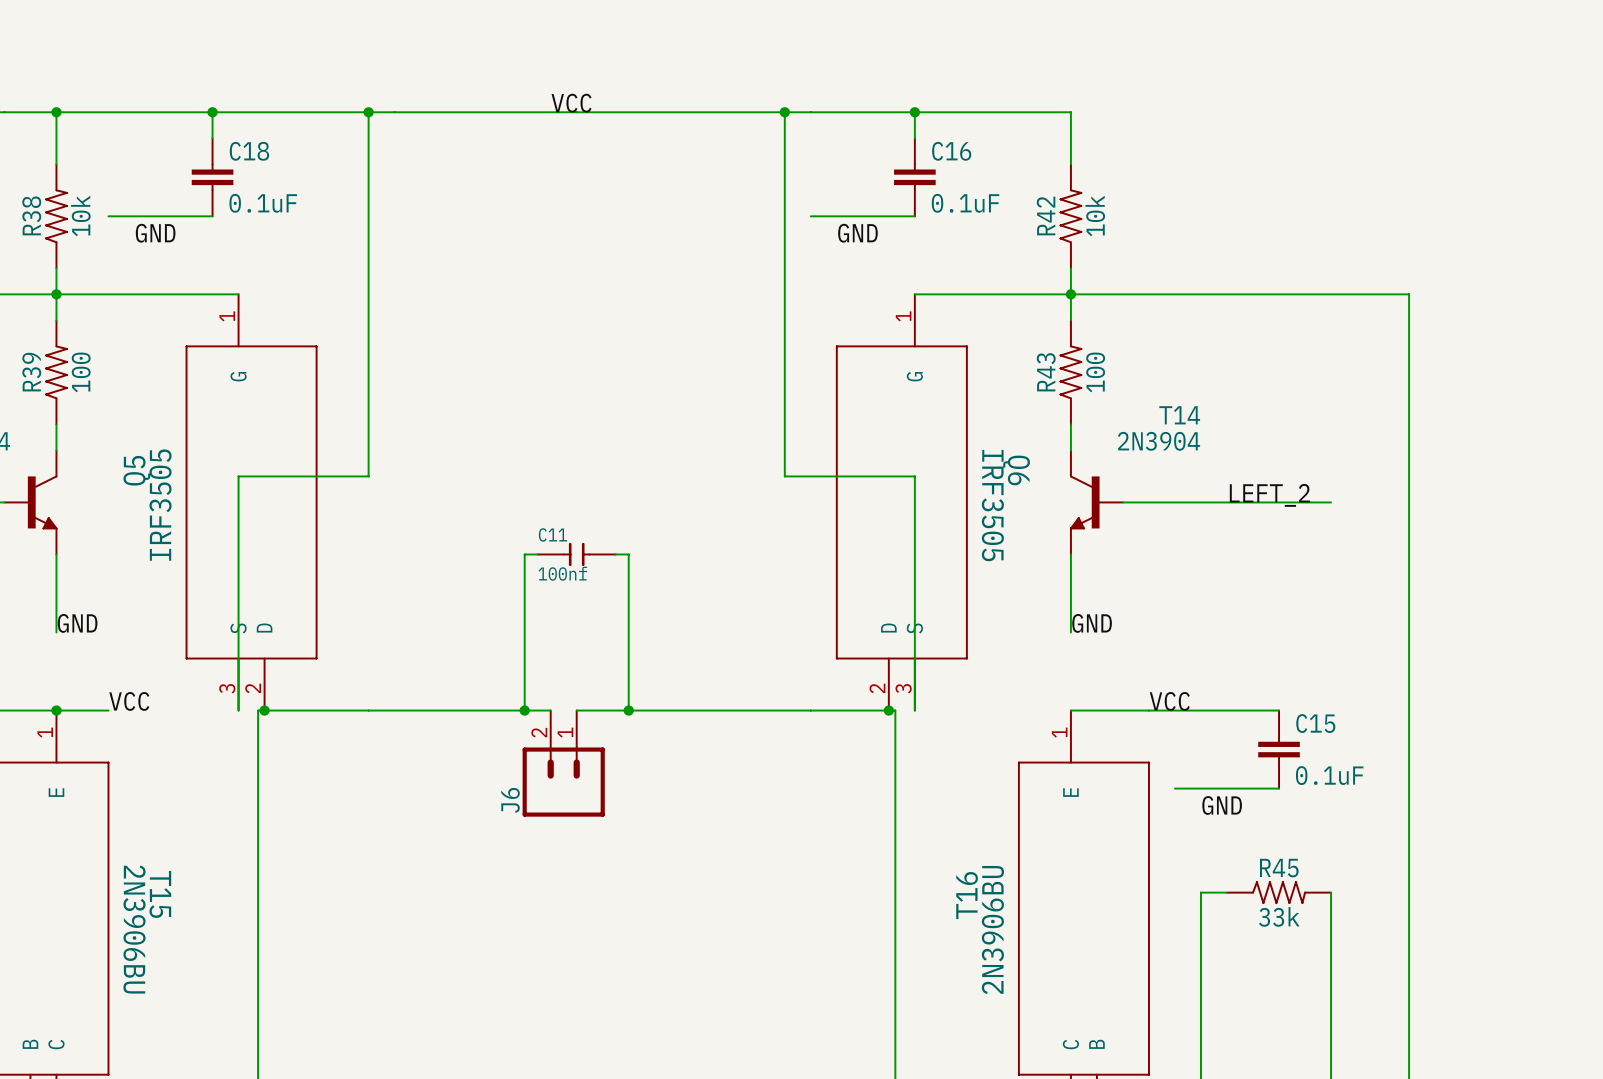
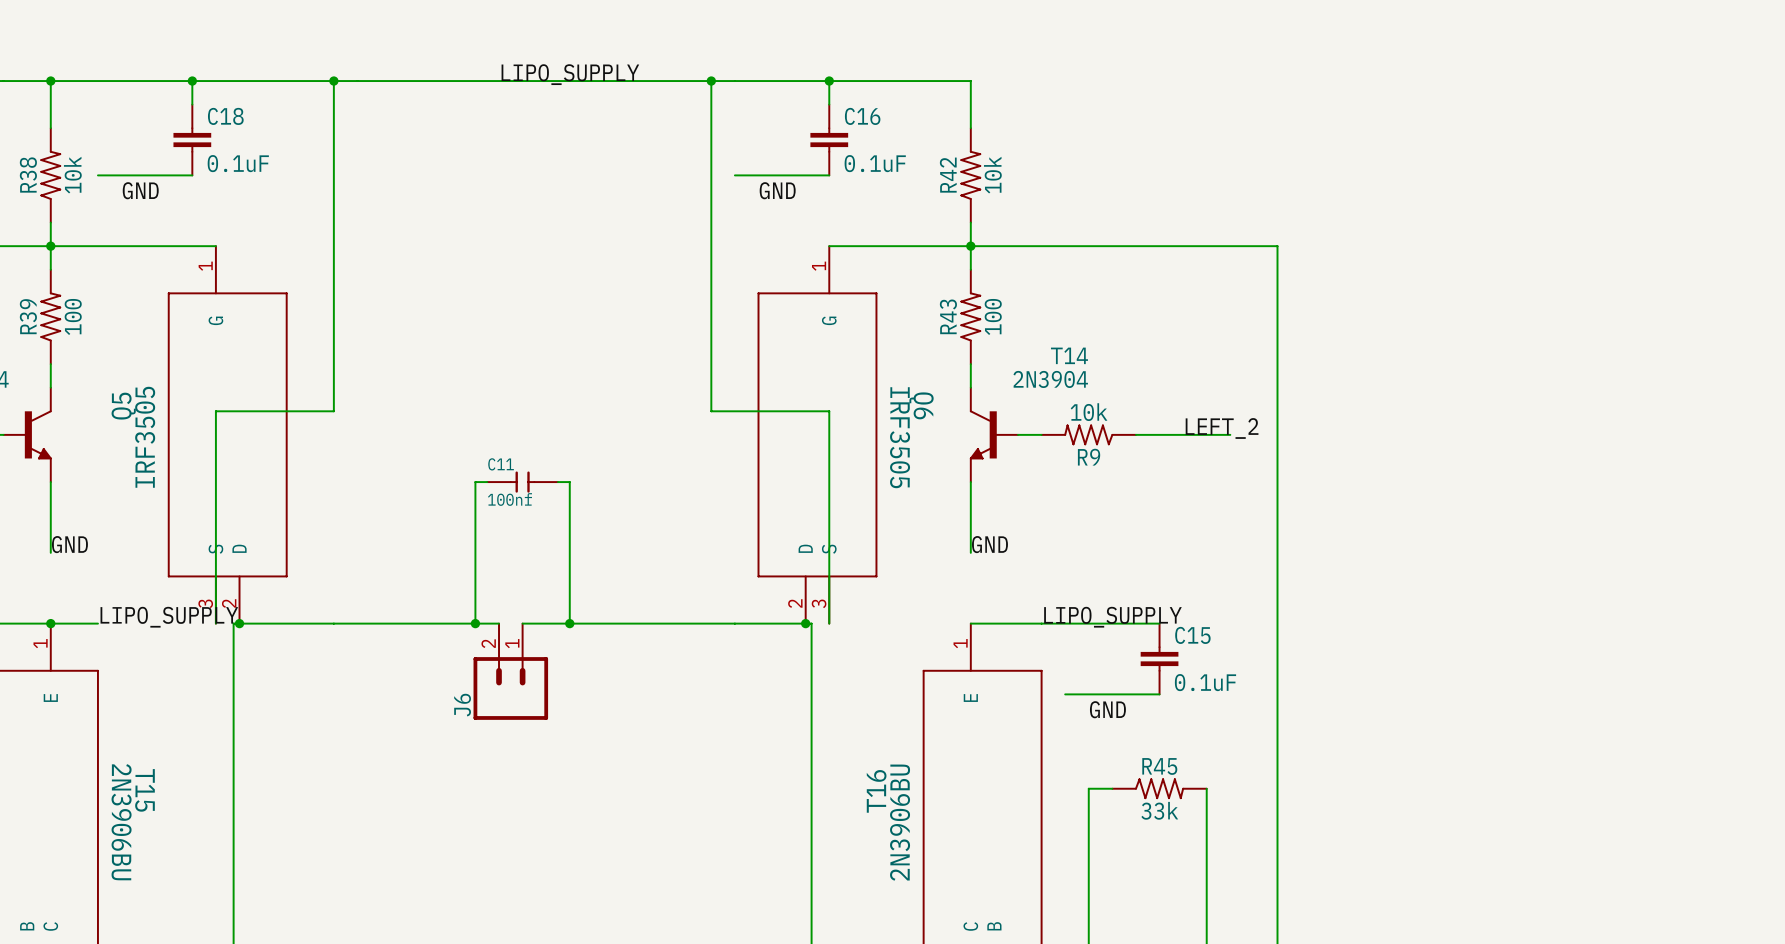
label: VCC (571, 103) -> LIPO_SUPPLY (570, 74)
label position: LEFT_2 (1269, 495) -> LEFT_2 (1222, 428)
R9: none -> 10k (1088, 434)
wire: none -> (1206, 434) (1230, 434)
label: VCC (129, 701) -> LIPO_SUPPLY (169, 617)
label: VCC (1169, 701) -> LIPO_SUPPLY (1112, 617)

